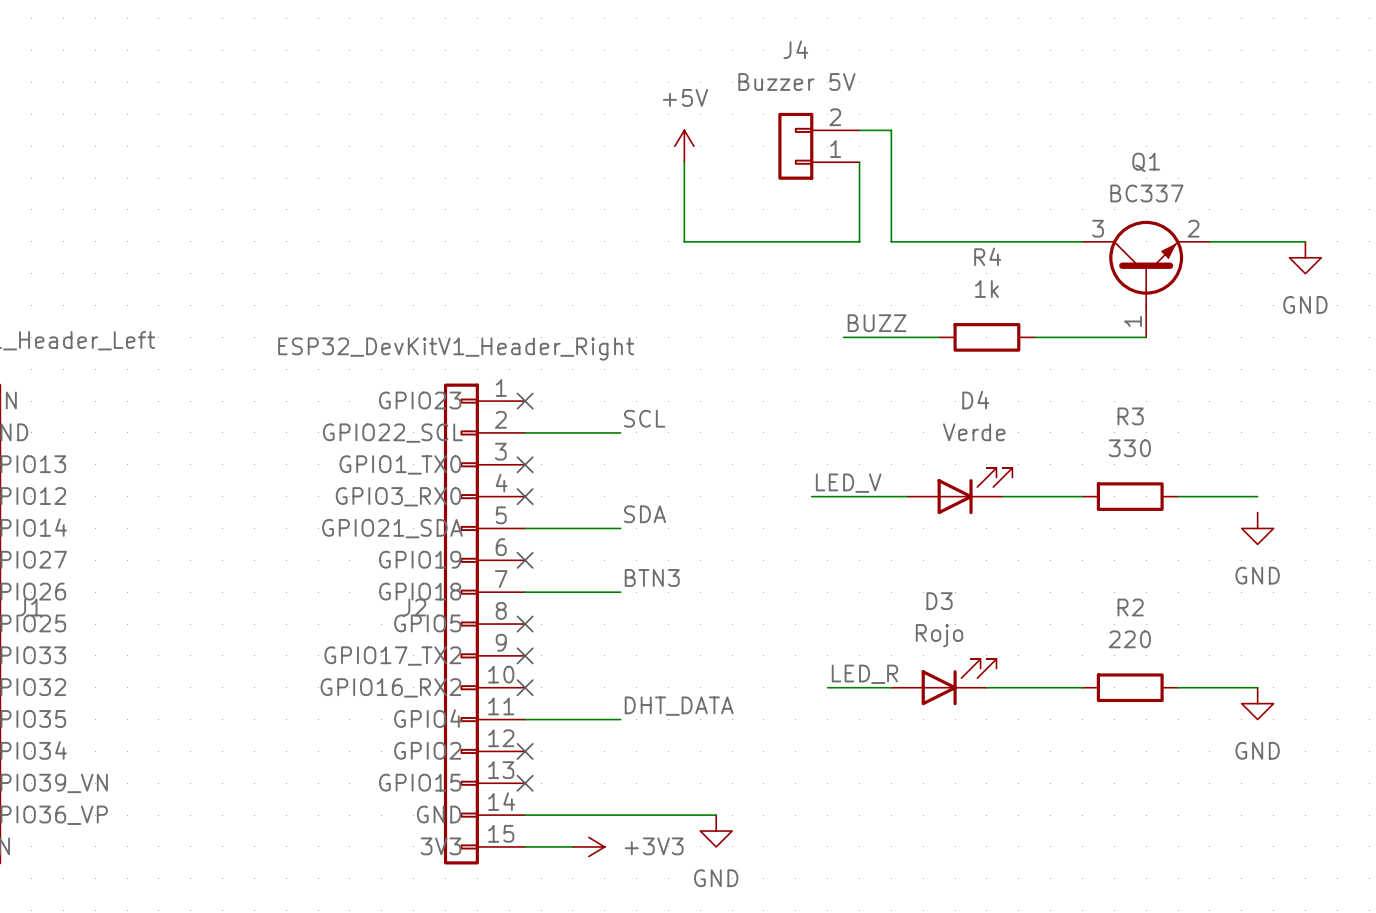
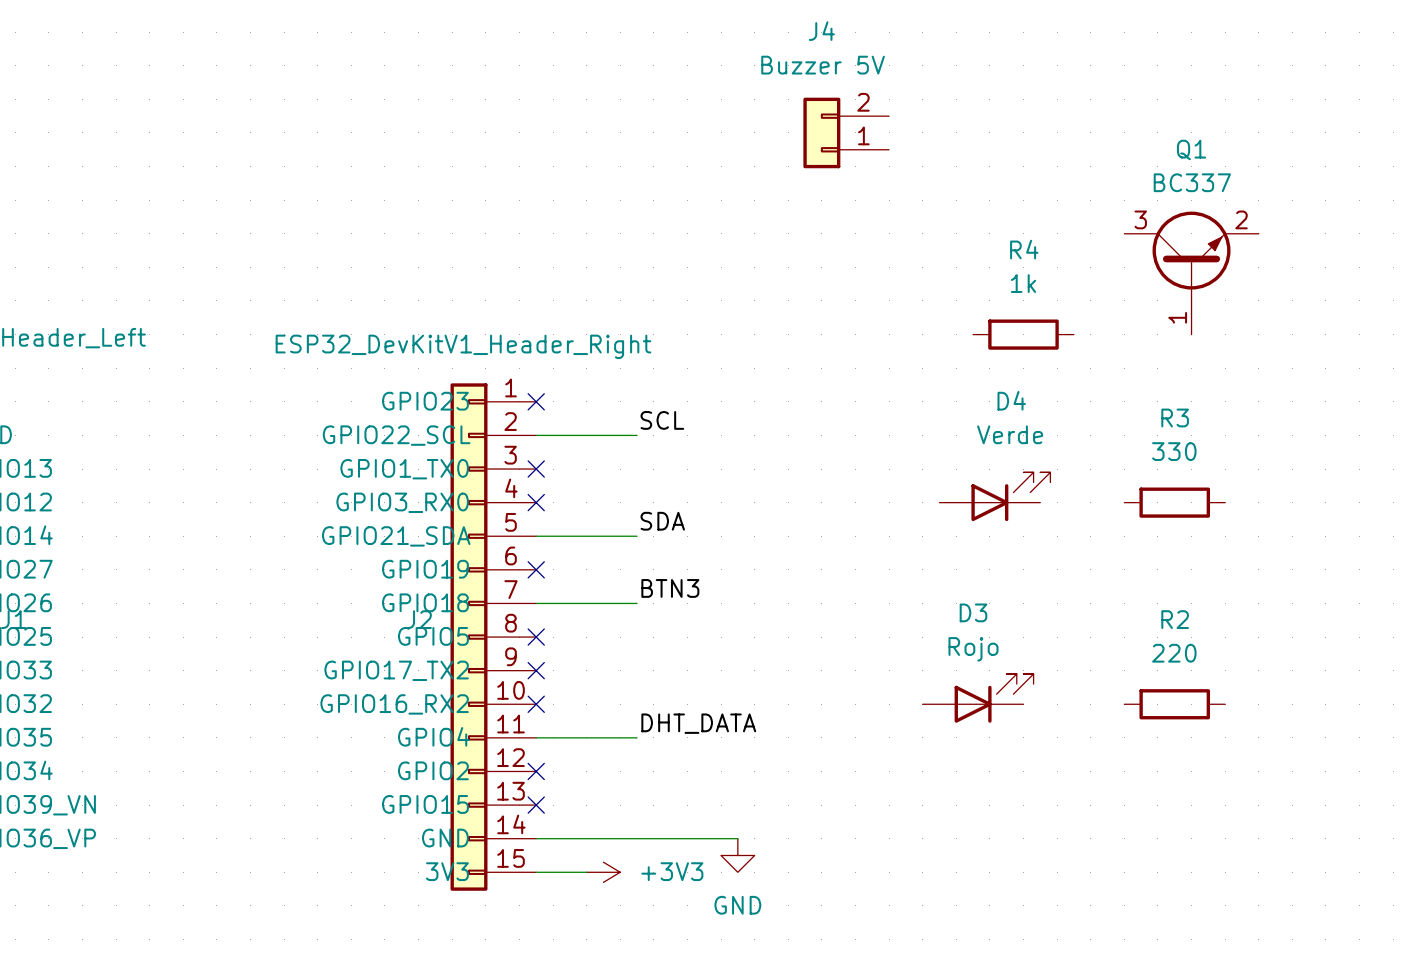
wire: (859, 130) (891, 130) (891, 241) (1082, 241) -> none
power symbol: +5V (684, 146) -> none
wire: (684, 162) (684, 241) (859, 241) (859, 162) -> none
wire: (1209, 241) (1305, 241) -> none
power symbol: GND (1305, 257) -> none
label: BUZZ (877, 323) -> none
wire: (843, 337) (939, 337) -> none
wire: (1034, 337) (1146, 337) -> none
label: LED_V (848, 483) -> none
wire: (811, 496) (907, 496) -> none
wire: (1002, 496) (1082, 496) -> none
wire: (1178, 496) (1257, 496) -> none
power symbol: GND (1257, 528) -> none
label: LED_R (864, 674) -> none
wire: (827, 687) (891, 687) -> none
wire: (986, 687) (1082, 687) -> none
wire: (1178, 687) (1257, 687) -> none
power symbol: GND (1257, 703) -> none

